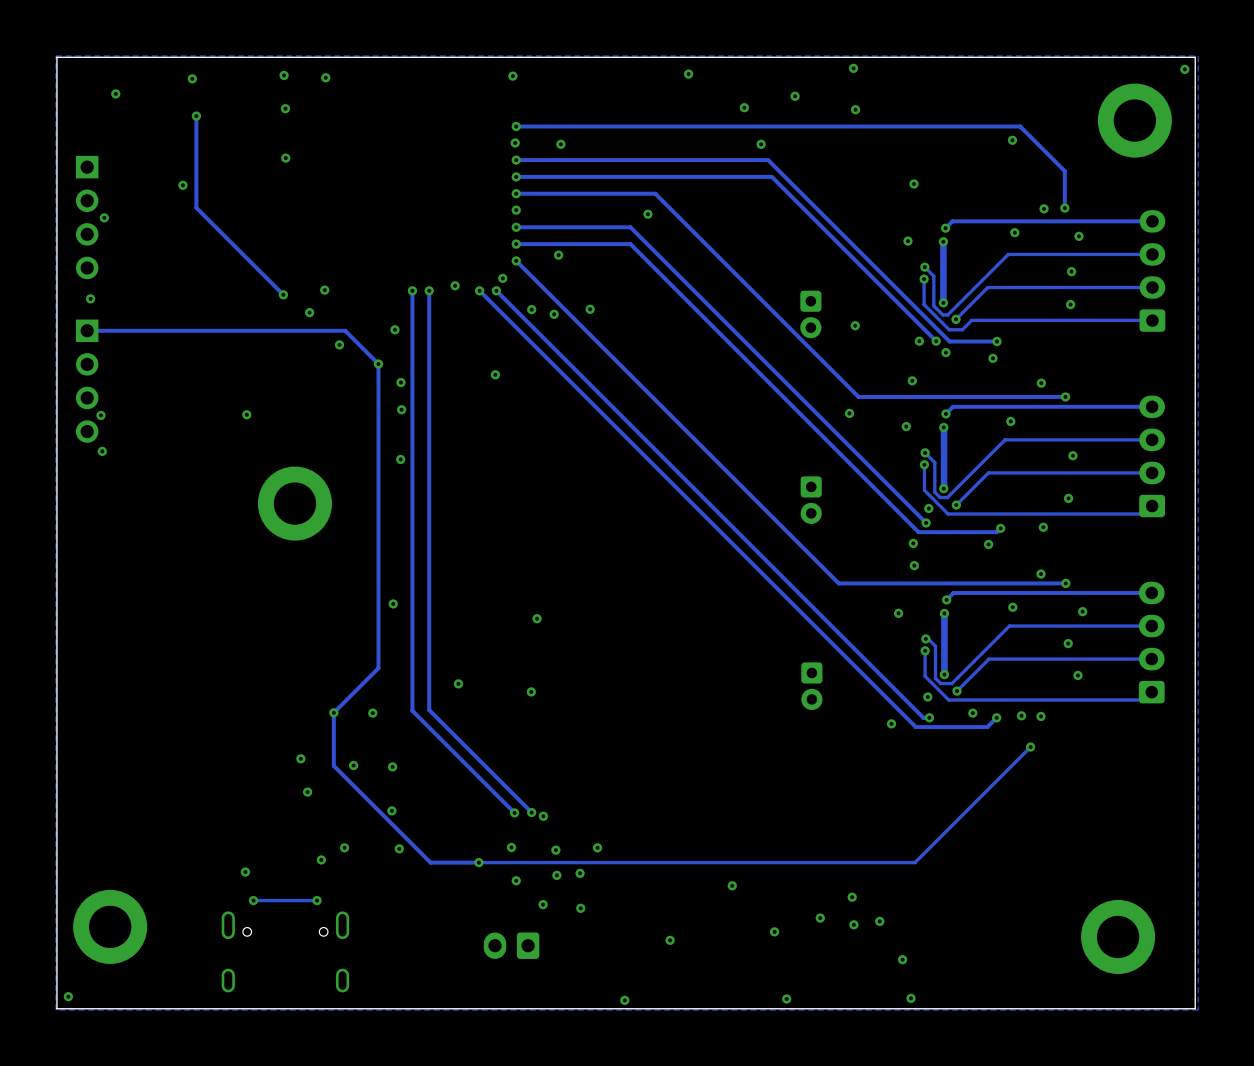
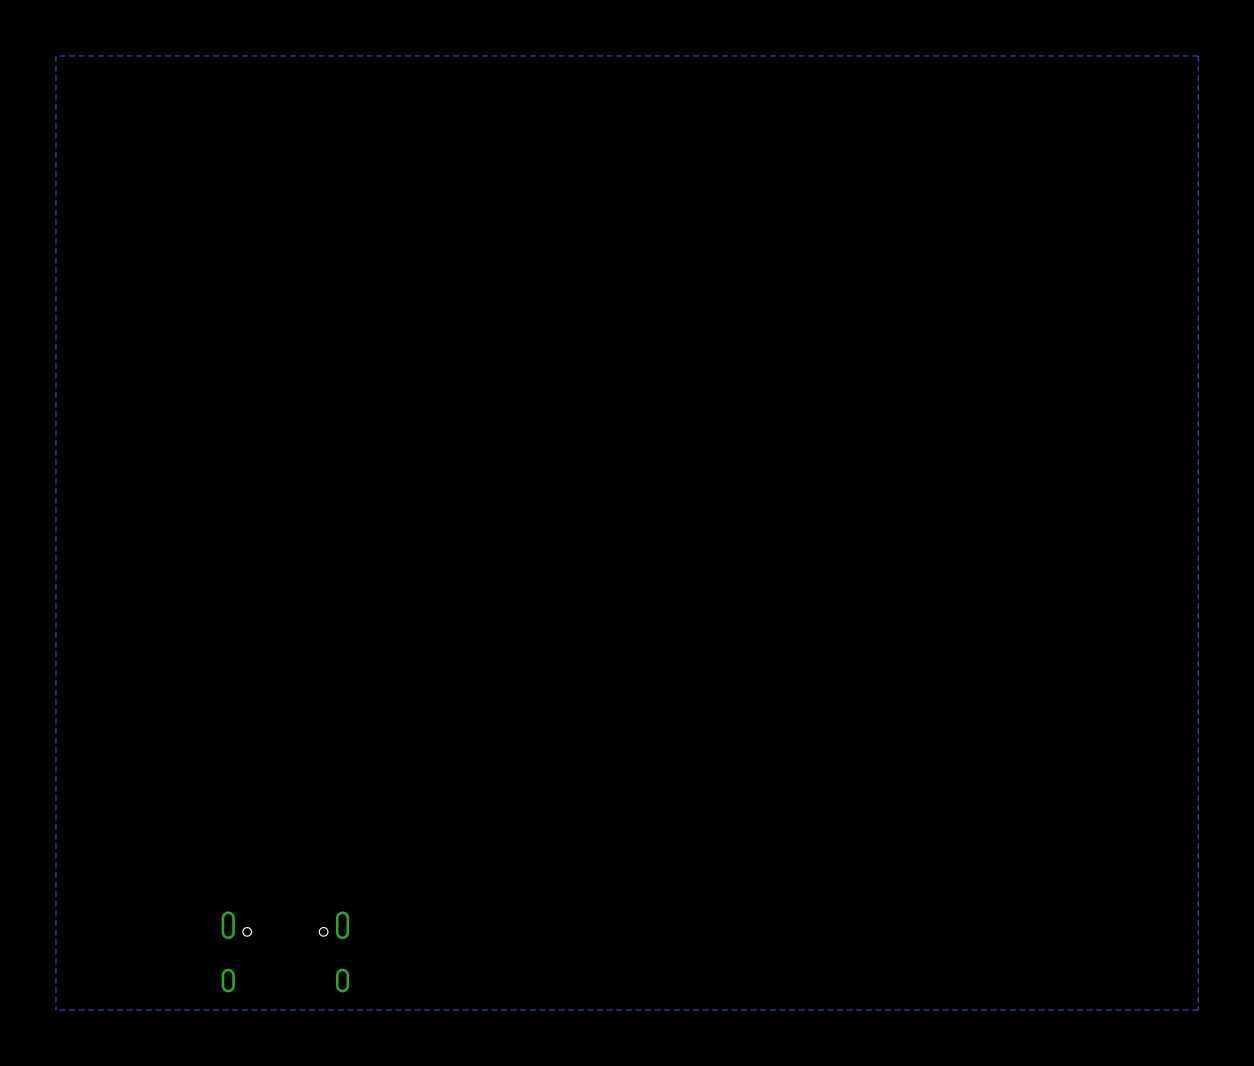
board edge: (1195, 57) (56, 57) (56, 1008) (1195, 1008) (1195, 57) -> none
via: (853, 68) -> none
via: (1184, 69) -> none
via: (688, 74) -> none
via: (284, 75) -> none
via: (512, 76) -> none
via: (325, 77) -> none
via: (192, 78) -> none
via: (115, 93) -> none
via: (795, 96) -> none
via: (744, 107) -> none
via: (285, 108) -> none
via: (855, 109) -> none
track: (196, 116) (196, 207) (283, 294) -> none
via: (196, 116) -> none
part: (1134, 120) -> none
track: (516, 126) (1020, 126) (1064, 171) (1064, 208) -> none
via: (516, 126) -> none
via: (1012, 140) -> none
via: (515, 142) -> none
via: (560, 144) -> none
via: (761, 144) -> none
via: (285, 158) -> none
track: (516, 160) (768, 160) (949, 341) (997, 341) -> none
via: (516, 160) -> none
track: (516, 176) (771, 176) (936, 341) -> none
via: (516, 176) -> none
via: (914, 183) -> none
via: (182, 185) -> none
track: (516, 193) (655, 193) (858, 396) (1065, 396) -> none
via: (516, 193) -> none
via: (1044, 208) -> none
via: (1064, 208) -> none
via: (516, 210) -> none
via: (647, 214) -> none
part: (87, 217) -> none
via: (104, 217) -> none
track: (1152, 221) (952, 221) (945, 228) -> none
track: (516, 227) (630, 227) (926, 522) -> none
via: (516, 227) -> none
via: (945, 228) -> none
via: (1014, 232) -> none
via: (1078, 236) -> none
via: (907, 241) -> none
track: (943, 241) (943, 302) -> none
via: (943, 241) -> none
track: (516, 244) (630, 244) (918, 532) (996, 532) (1000, 528) -> none
via: (516, 244) -> none
track: (1152, 254) (1008, 254) (947, 314) (942, 314) (933, 305) (933, 276) (924, 267) -> none
via: (558, 255) -> none
track: (516, 260) (838, 583) (1065, 583) -> none
via: (516, 260) -> none
via: (924, 267) -> none
part: (1152, 270) -> none
via: (1071, 271) -> none
via: (502, 278) -> none
track: (924, 279) (924, 304) (949, 329) (962, 329) (971, 320) (1152, 320) -> none
via: (924, 279) -> none
via: (455, 285) -> none
track: (1152, 287) (987, 287) (956, 319) -> none
via: (324, 290) -> none
track: (412, 290) (412, 710) (514, 812) -> none
via: (412, 290) -> none
track: (429, 290) (429, 710) (531, 812) -> none
via: (429, 290) -> none
track: (479, 290) (915, 727) (987, 727) (996, 717) -> none
via: (479, 290) -> none
track: (496, 290) (923, 717) (929, 717) -> none
via: (496, 290) -> none
via: (283, 294) -> none
via: (90, 298) -> none
via: (943, 302) -> none
via: (1070, 304) -> none
via: (531, 309) -> none
via: (590, 309) -> none
via: (309, 312) -> none
via: (554, 314) -> none
part: (810, 314) -> none
via: (956, 319) -> none
via: (855, 325) -> none
via: (394, 329) -> none
track: (87, 330) (345, 330) (378, 364) (378, 668) (333, 712) (333, 765) (430, 862) (915, 862) (1030, 747) -> none
via: (919, 341) -> none
via: (936, 341) -> none
via: (997, 341) -> none
via: (339, 344) -> none
via: (945, 352) -> none
via: (992, 358) -> none
via: (378, 364) -> none
via: (495, 374) -> none
via: (912, 380) -> none
part: (87, 381) -> none
via: (400, 382) -> none
via: (1041, 383) -> none
via: (1065, 396) -> none
track: (1152, 406) (953, 406) (945, 413) -> none
via: (401, 409) -> none
via: (849, 413) -> none
via: (945, 413) -> none
via: (246, 414) -> none
via: (100, 415) -> none
via: (1010, 421) -> none
via: (906, 426) -> none
via: (943, 427) -> none
track: (944, 427) (944, 488) -> none
track: (1152, 439) (1005, 439) (947, 497) (940, 497) (934, 492) (934, 462) (925, 452) -> none
via: (102, 451) -> none
via: (925, 452) -> none
via: (1072, 455) -> none
part: (1152, 456) -> none
via: (400, 459) -> none
track: (924, 464) (924, 490) (948, 513) (1144, 513) (1152, 506) -> none
via: (924, 464) -> none
track: (1152, 472) (988, 472) (956, 505) -> none
via: (943, 488) -> none
via: (1068, 498) -> none
part: (811, 500) -> none
part: (294, 503) -> none
via: (956, 505) -> none
via: (928, 508) -> none
via: (926, 522) -> none
via: (1043, 527) -> none
via: (1000, 528) -> none
via: (913, 543) -> none
via: (988, 544) -> none
via: (914, 565) -> none
via: (1041, 574) -> none
via: (1065, 583) -> none
track: (1151, 592) (953, 592) (946, 599) -> none
via: (946, 599) -> none
via: (393, 603) -> none
via: (1012, 607) -> none
via: (1082, 611) -> none
via: (898, 613) -> none
track: (944, 613) (944, 674) -> none
via: (944, 613) -> none
via: (537, 618) -> none
track: (1151, 626) (1009, 626) (951, 683) (940, 683) (935, 678) (935, 646) (925, 638) -> none
via: (925, 638) -> none
part: (1151, 642) -> none
via: (1068, 643) -> none
track: (925, 650) (925, 676) (948, 700) (1143, 700) (1151, 692) -> none
via: (925, 650) -> none
track: (1151, 659) (989, 659) (957, 691) -> none
via: (944, 674) -> none
via: (1077, 675) -> none
via: (458, 683) -> none
part: (811, 686) -> none
via: (531, 691) -> none
via: (957, 691) -> none
via: (927, 696) -> none
via: (333, 712) -> none
via: (372, 713) -> none
via: (972, 713) -> none
via: (1021, 715) -> none
via: (1041, 716) -> none
via: (929, 717) -> none
via: (996, 717) -> none
via: (891, 723) -> none
via: (1030, 747) -> none
via: (300, 758) -> none
via: (353, 765) -> none
via: (392, 766) -> none
via: (307, 792) -> none
via: (391, 810) -> none
via: (514, 812) -> none
via: (531, 812) -> none
via: (543, 816) -> none
via: (344, 847) -> none
via: (511, 847) -> none
via: (597, 847) -> none
via: (399, 848) -> none
via: (555, 850) -> none
via: (321, 859) -> none
via: (478, 862) -> none
via: (245, 872) -> none
via: (580, 873) -> none
via: (556, 875) -> none
via: (516, 880) -> none
via: (732, 885) -> none
via: (852, 897) -> none
via: (253, 900) -> none
track: (317, 900) (253, 900) -> none
via: (317, 900) -> none
via: (543, 904) -> none
via: (580, 908) -> none
via: (820, 918) -> none
via: (879, 921) -> none
via: (853, 924) -> none
part: (110, 926) -> none
via: (774, 931) -> none
part: (1118, 936) -> none
via: (670, 940) -> none
part: (511, 945) -> none
via: (902, 959) -> none
via: (68, 996) -> none
via: (910, 998) -> none
via: (786, 999) -> none
via: (624, 1000) -> none

